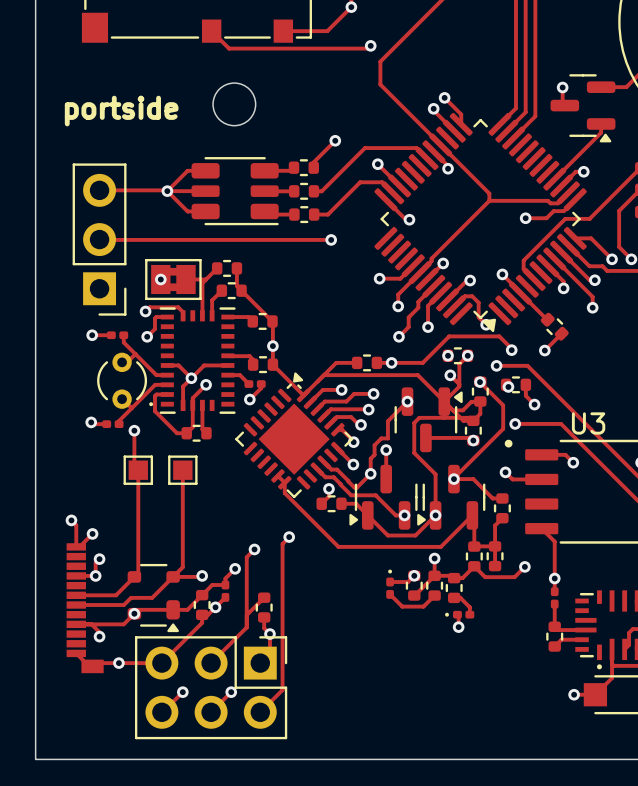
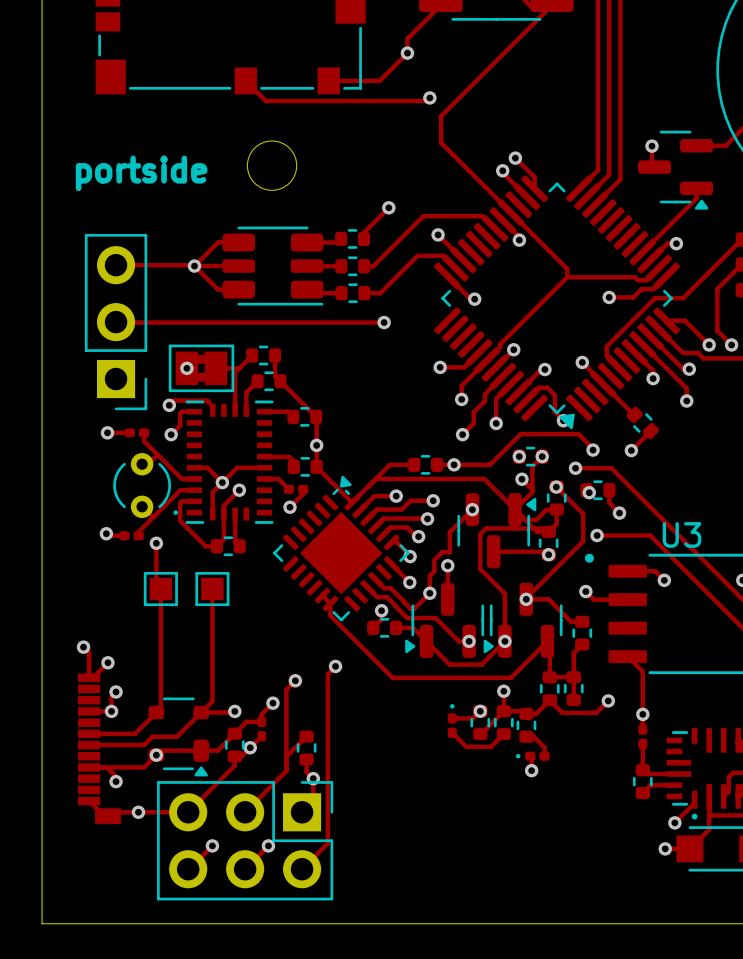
track: none -> (694, 799) (694, 803) (674, 822)
via: none -> (674, 822)

